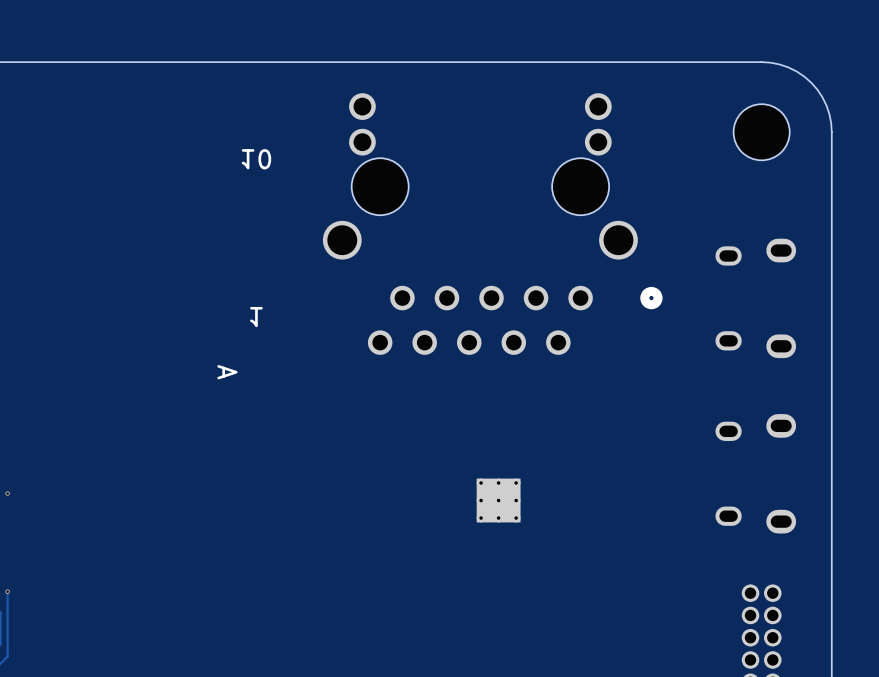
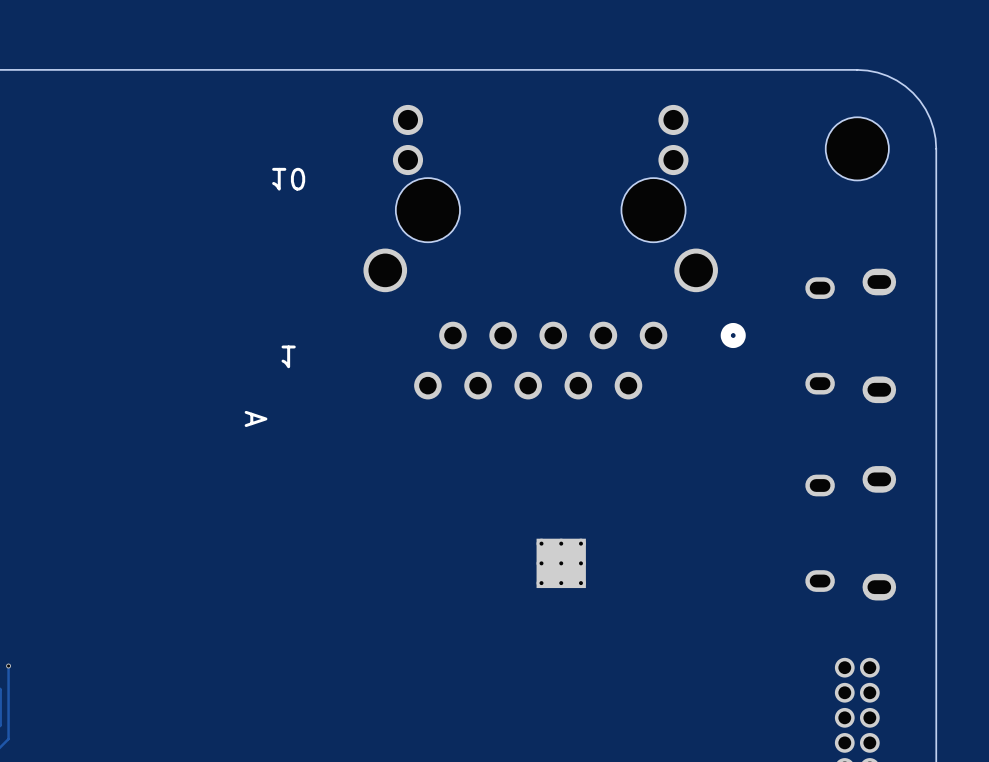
via: (7, 493) -> none

